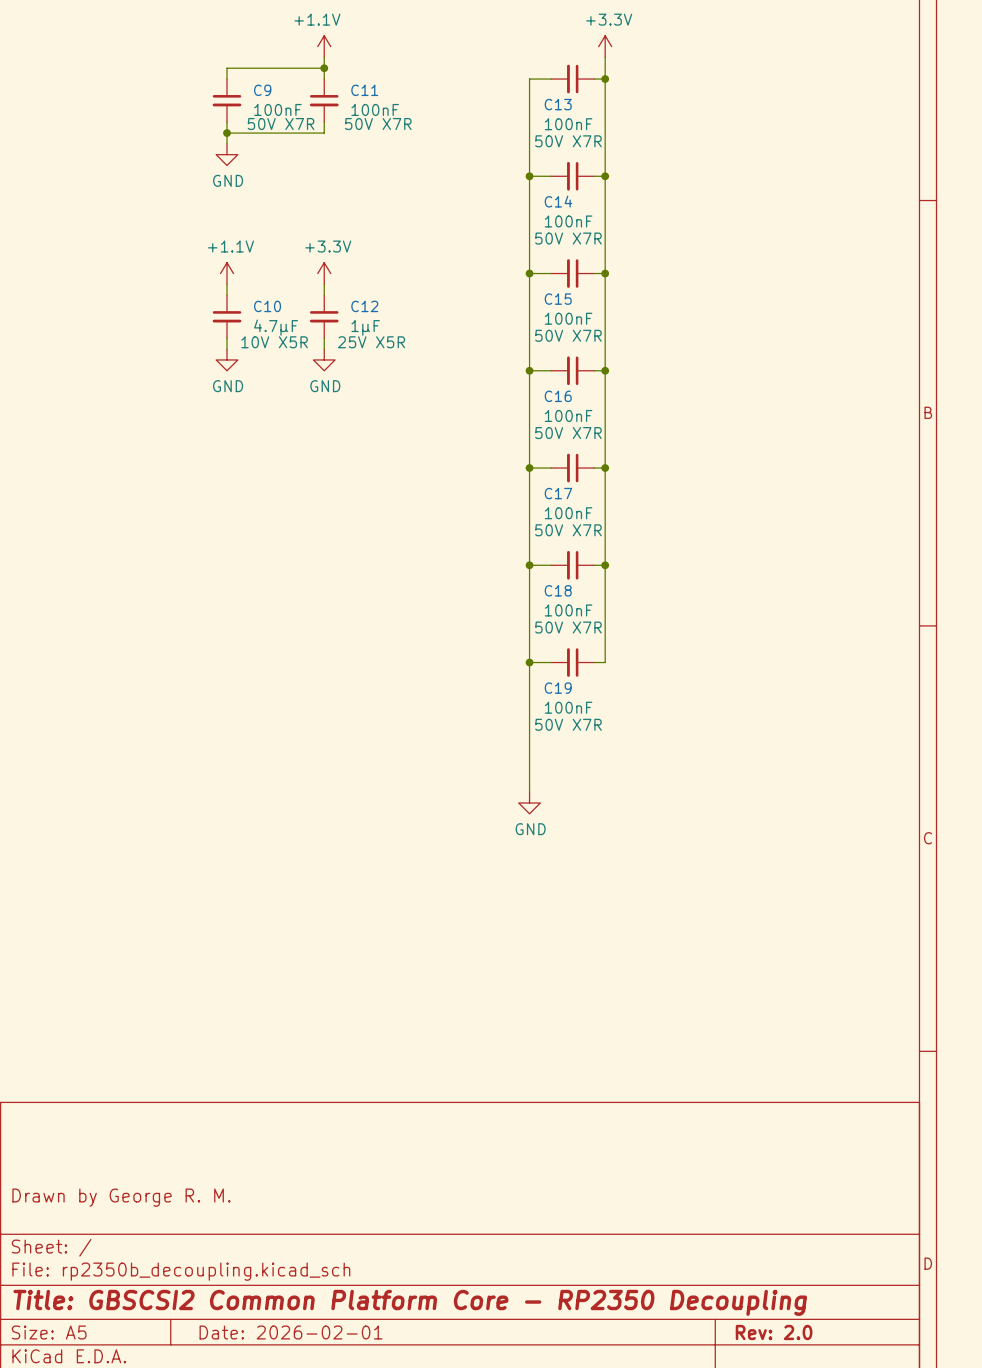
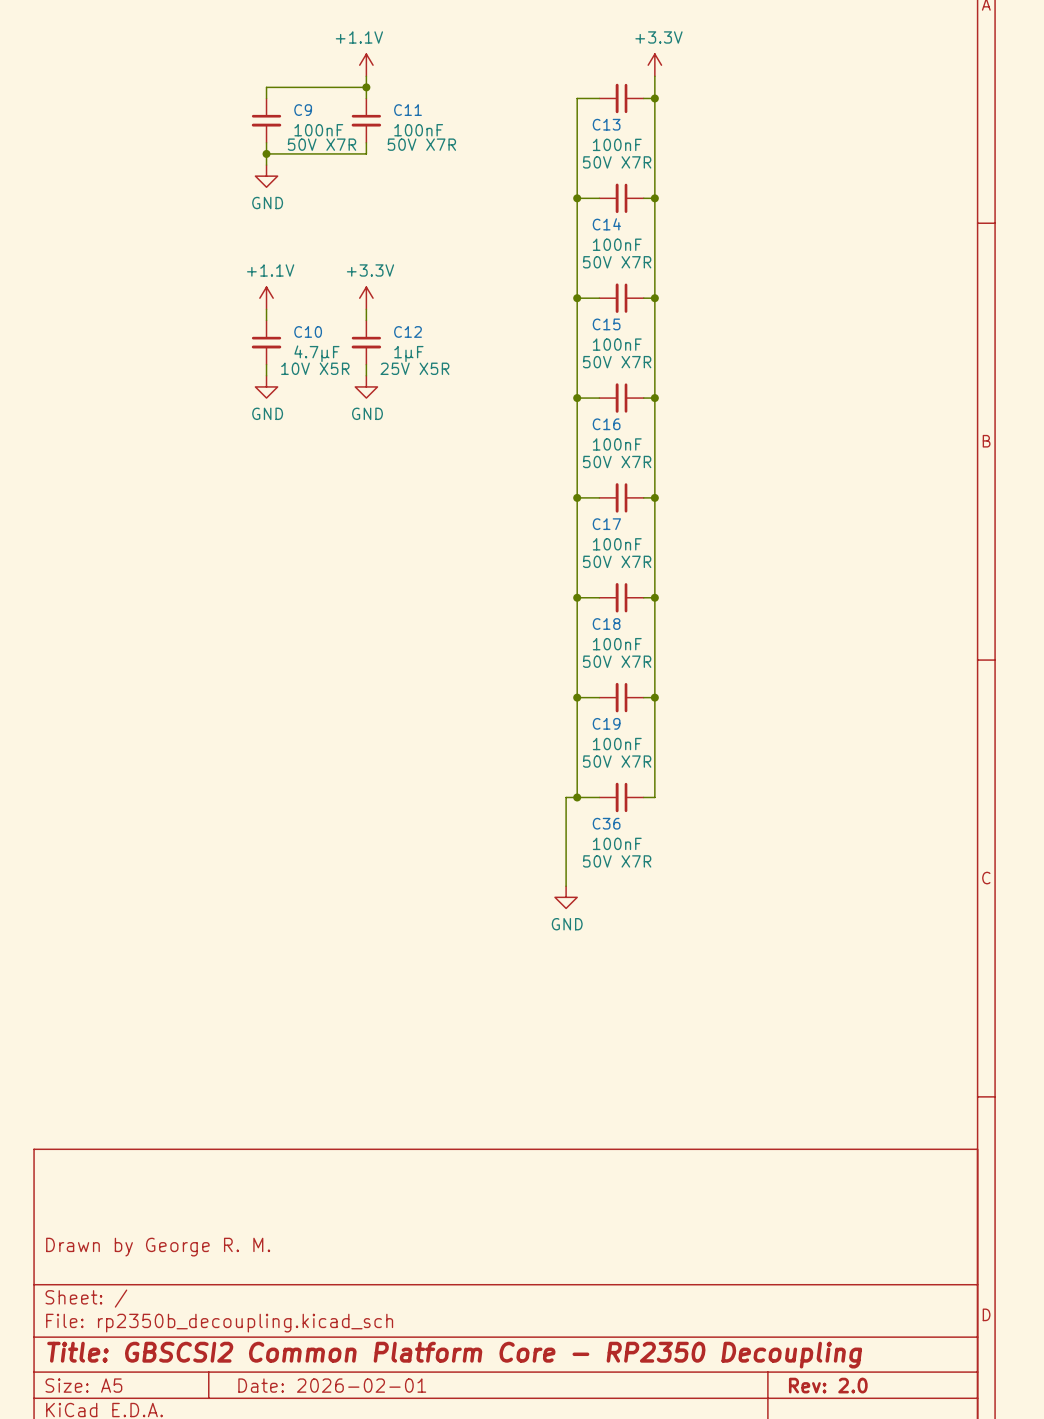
wire: none -> (654, 697) (654, 797) (643, 797)
junction: none -> (654, 697)
wire: (529, 759) (529, 792) -> none
junction: none -> (577, 797)
wire: none -> (599, 797) (566, 797) (566, 886)
C36: none -> 100nF (621, 797)
power symbol position: GND (529, 803) -> GND (566, 897)

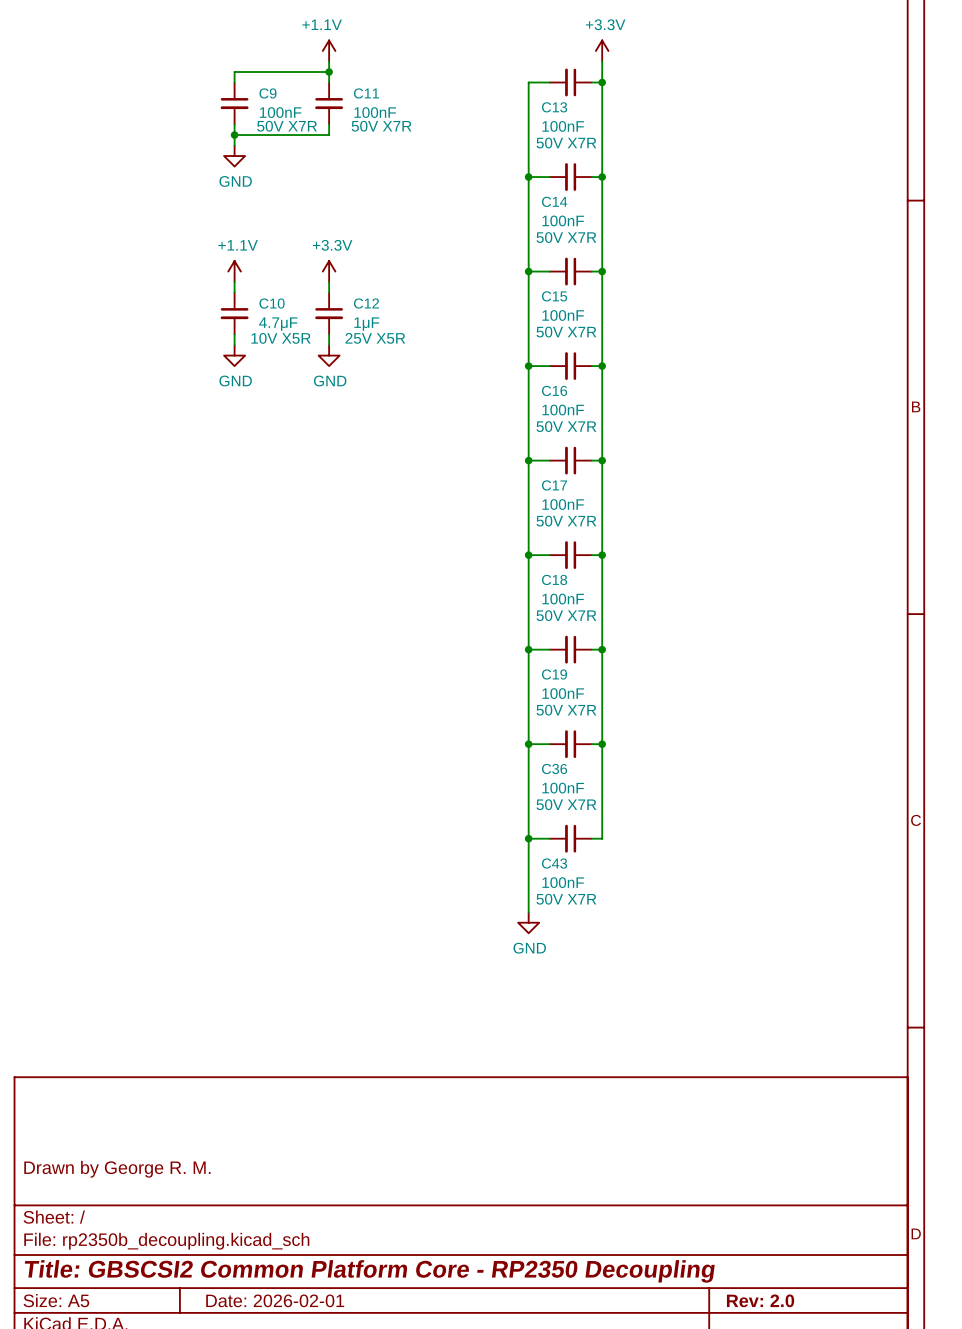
wire: (577, 797) (566, 797) (566, 886) -> (528, 744) (528, 912)
wire: none -> (602, 744) (602, 838) (591, 838)
junction: none -> (602, 744)
power symbol position: GND (566, 897) -> GND (528, 922)
wire: none -> (528, 838) (549, 838)
junction: none -> (528, 838)
C43: none -> 100nF (570, 838)

